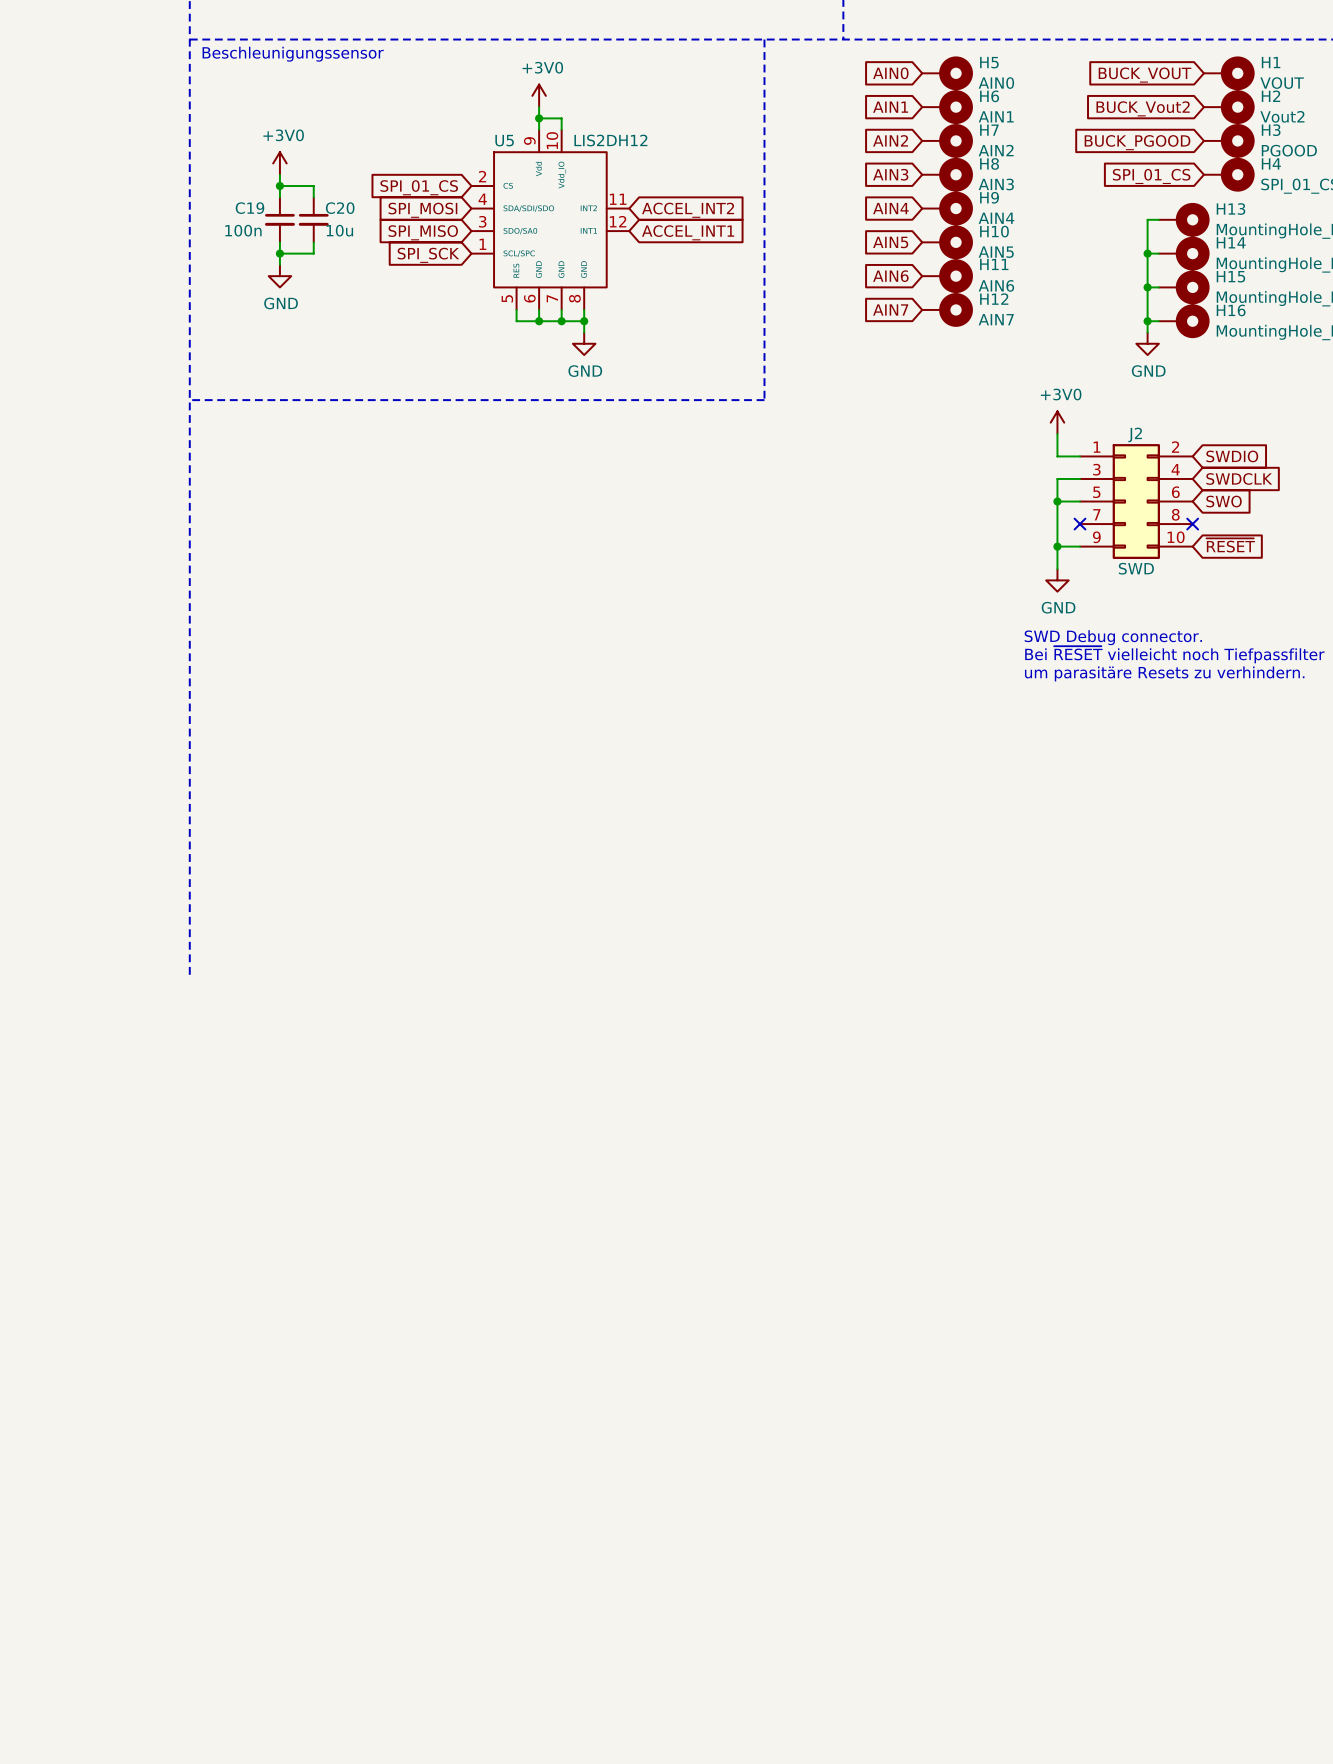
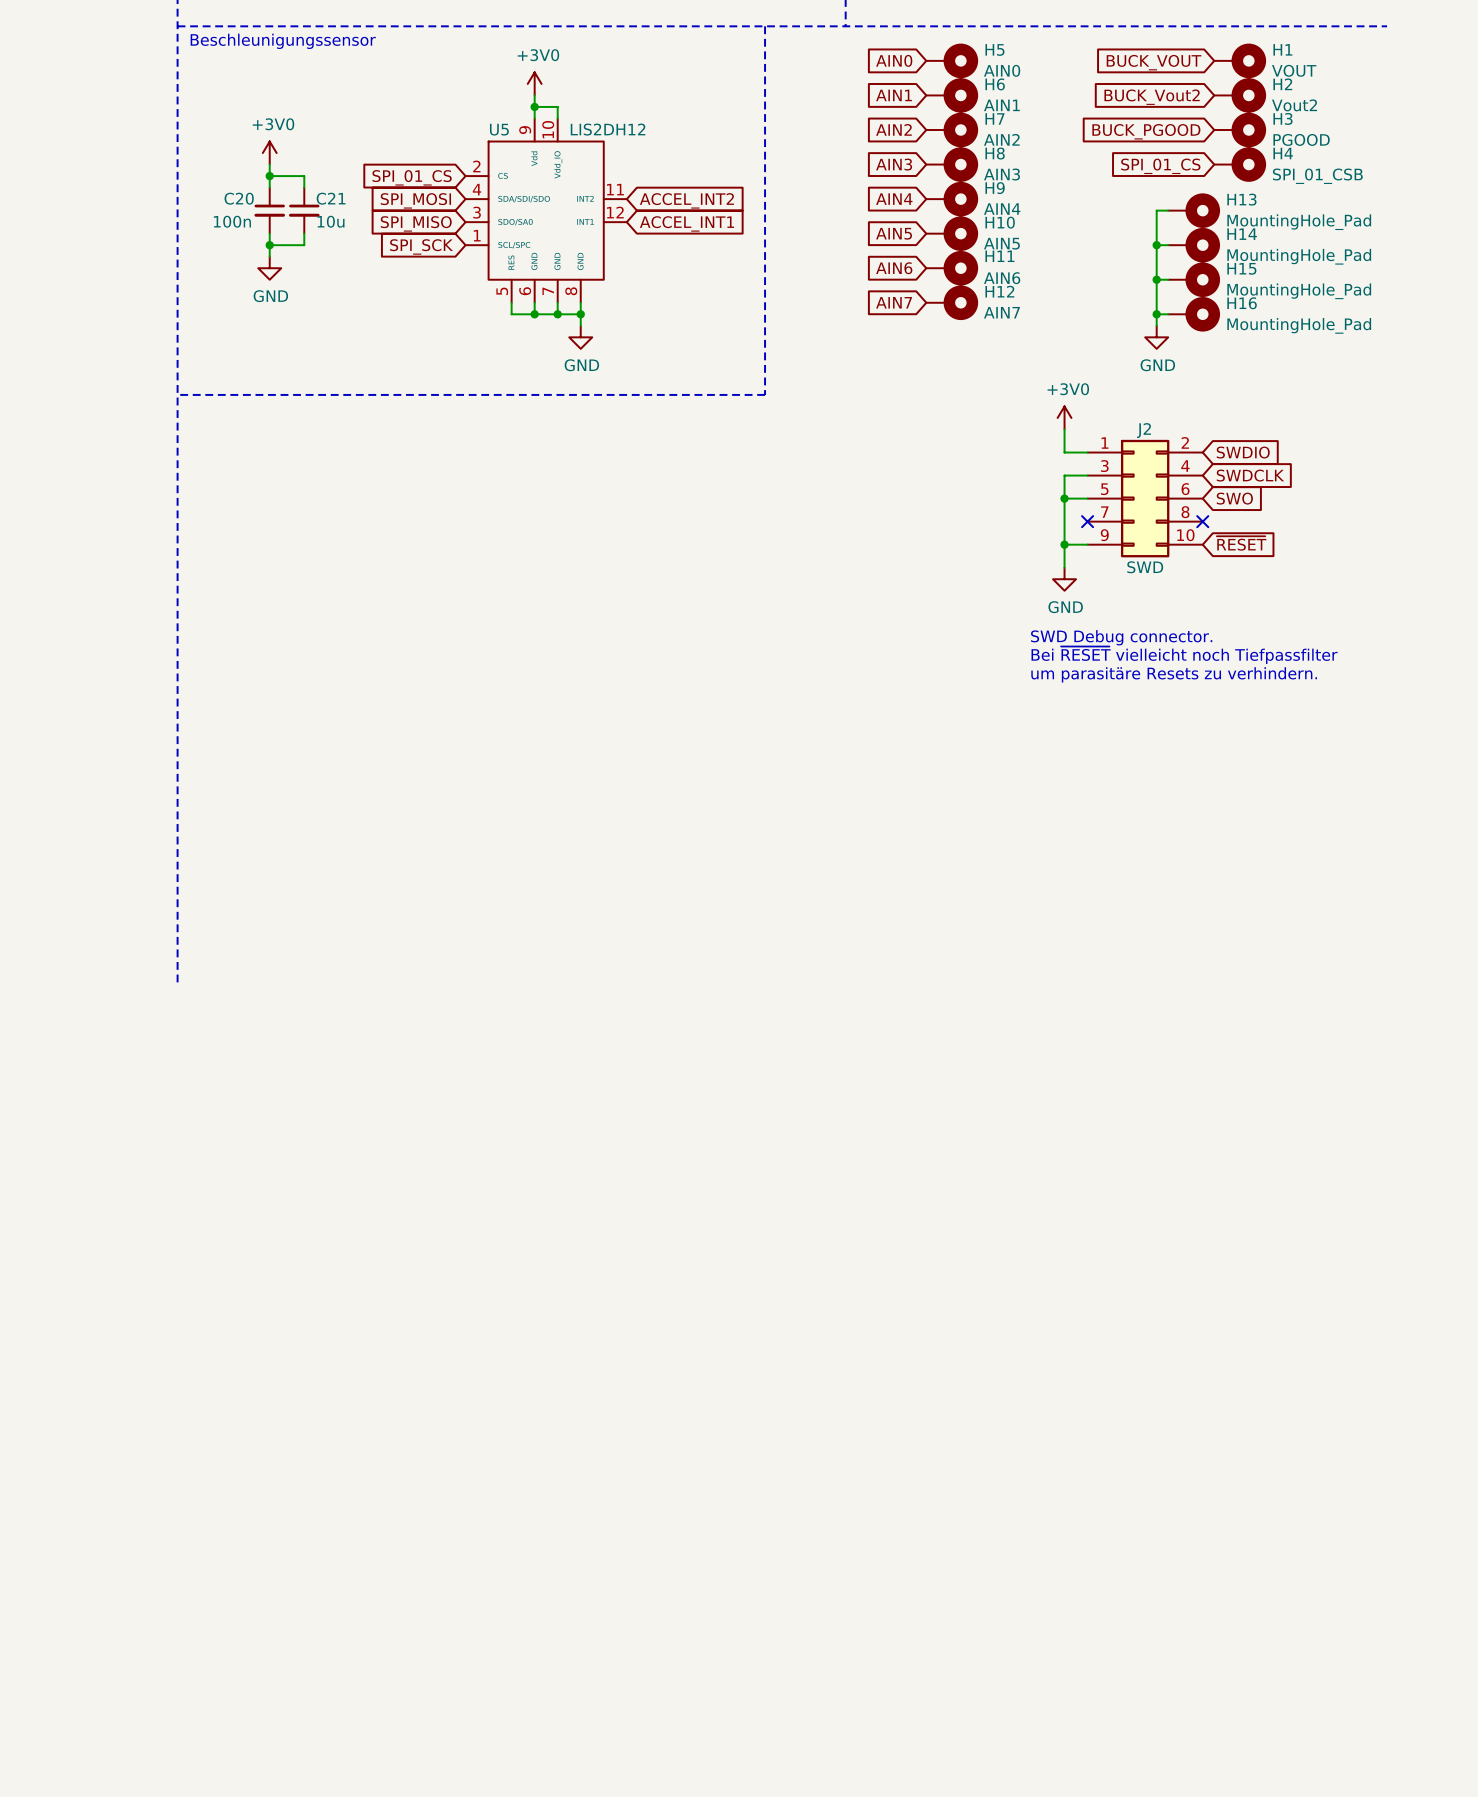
C19 name: C19 (249, 208) -> C20 (239, 198)
C20 name: C20 (340, 208) -> C21 (331, 198)

